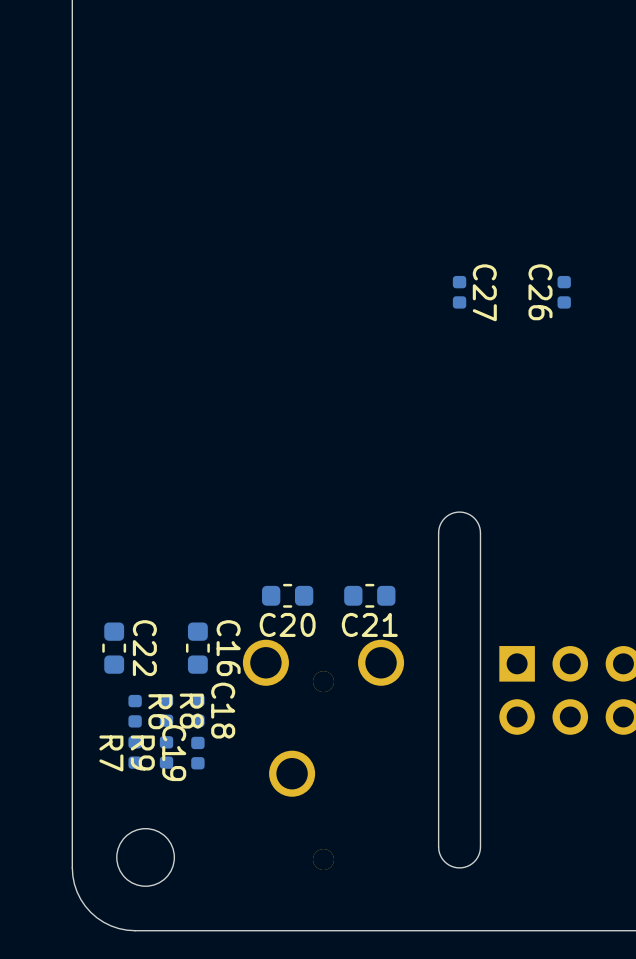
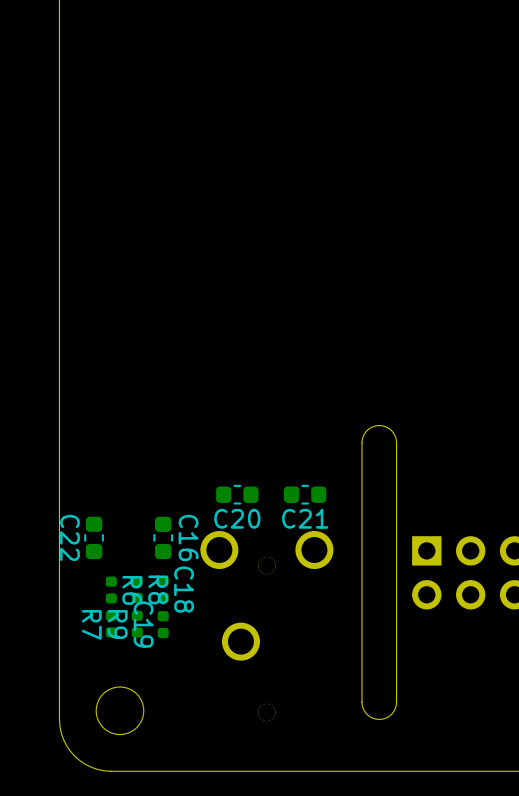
C27: (459, 292) -> none
C26: (564, 292) -> none
C22 name position: C22 (144, 648) -> C22 (69, 537)

